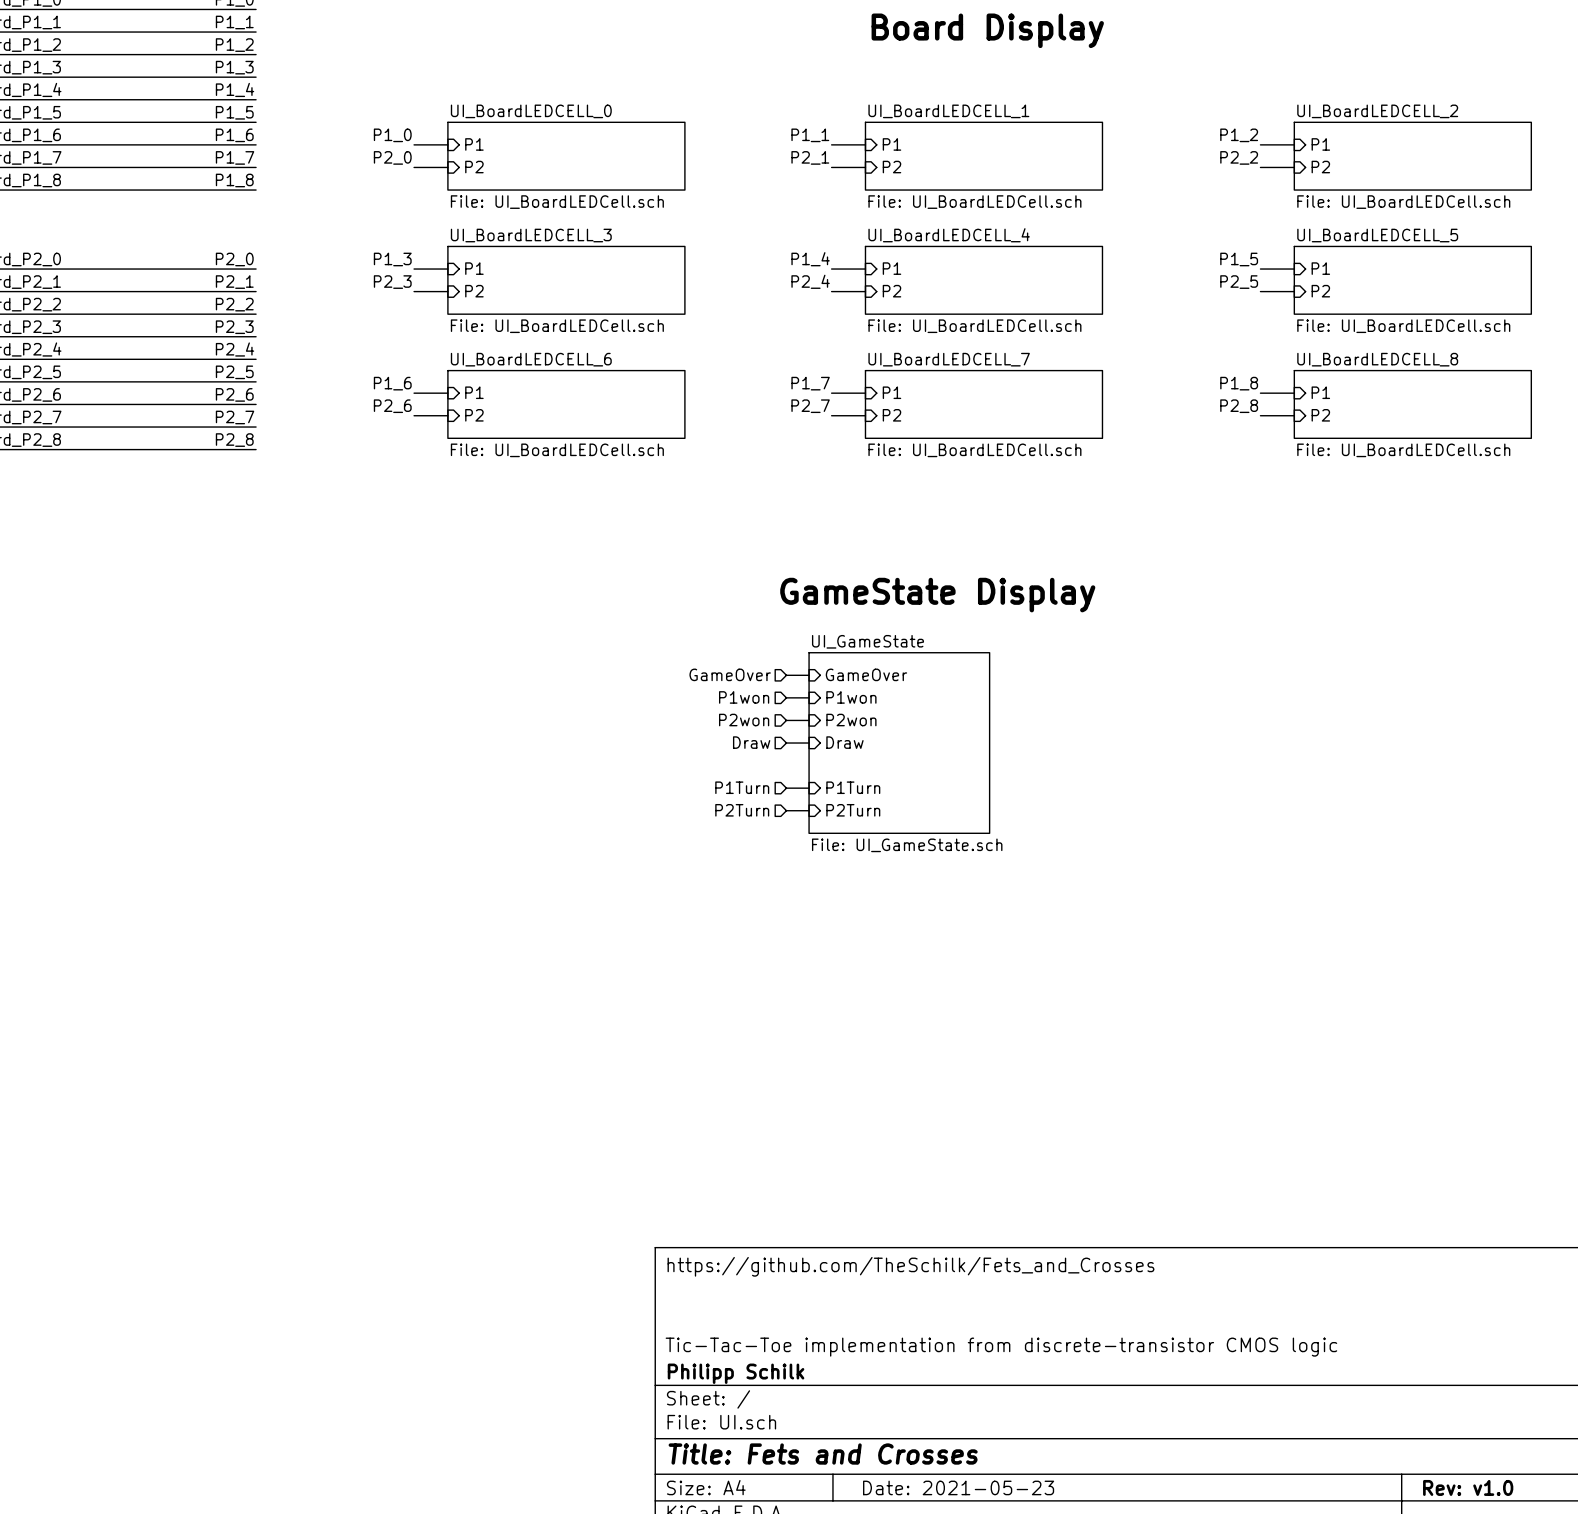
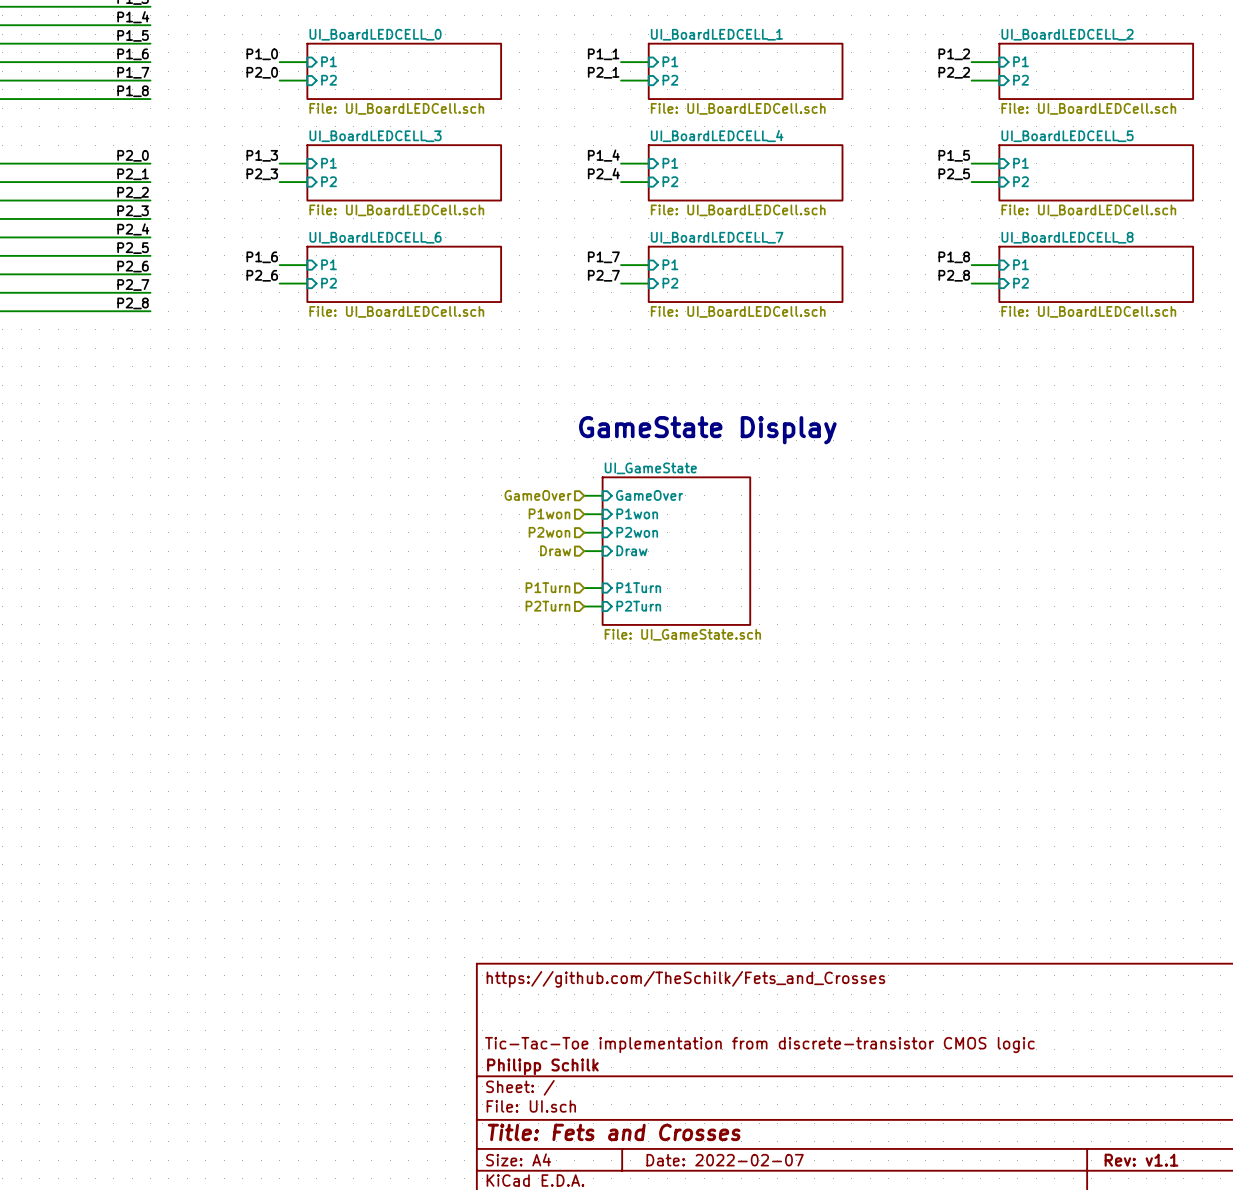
title block: Date: 2021-05-23 (958, 1487) -> Date: 2022-02-07 (725, 1160)
title block: Rev: v1.0 (1468, 1487) -> Rev: v1.1 (1141, 1160)

